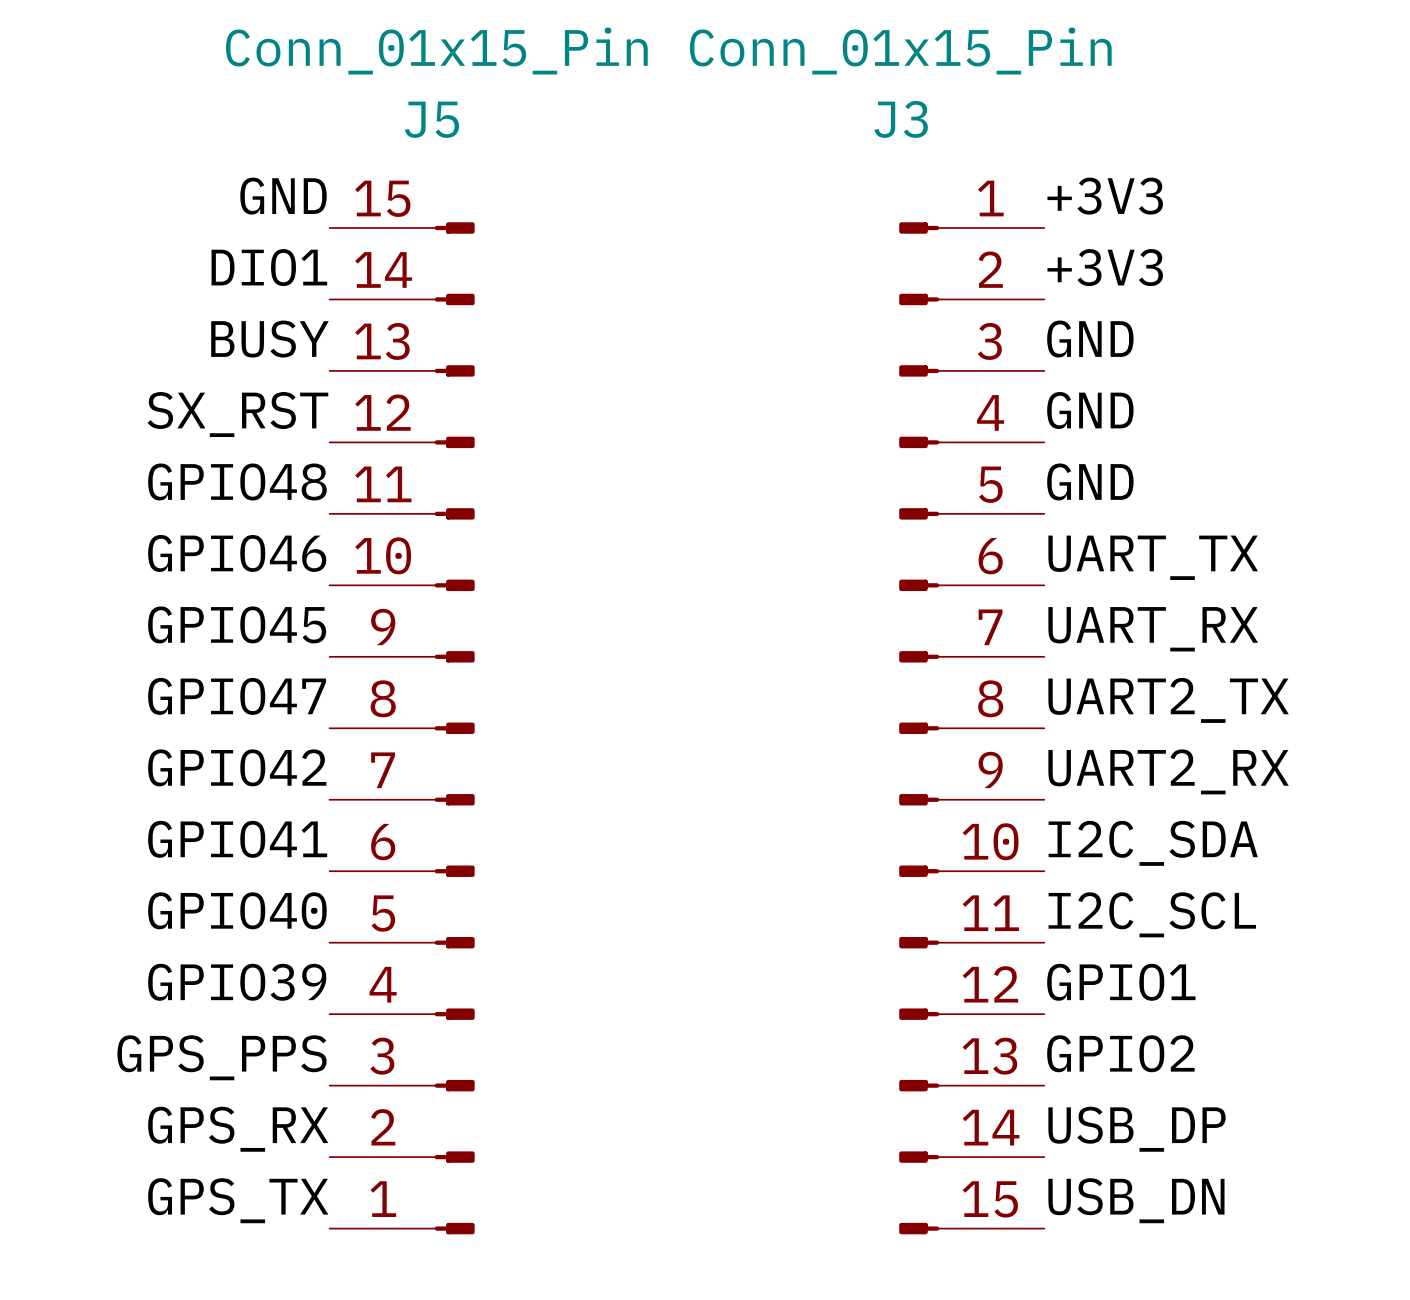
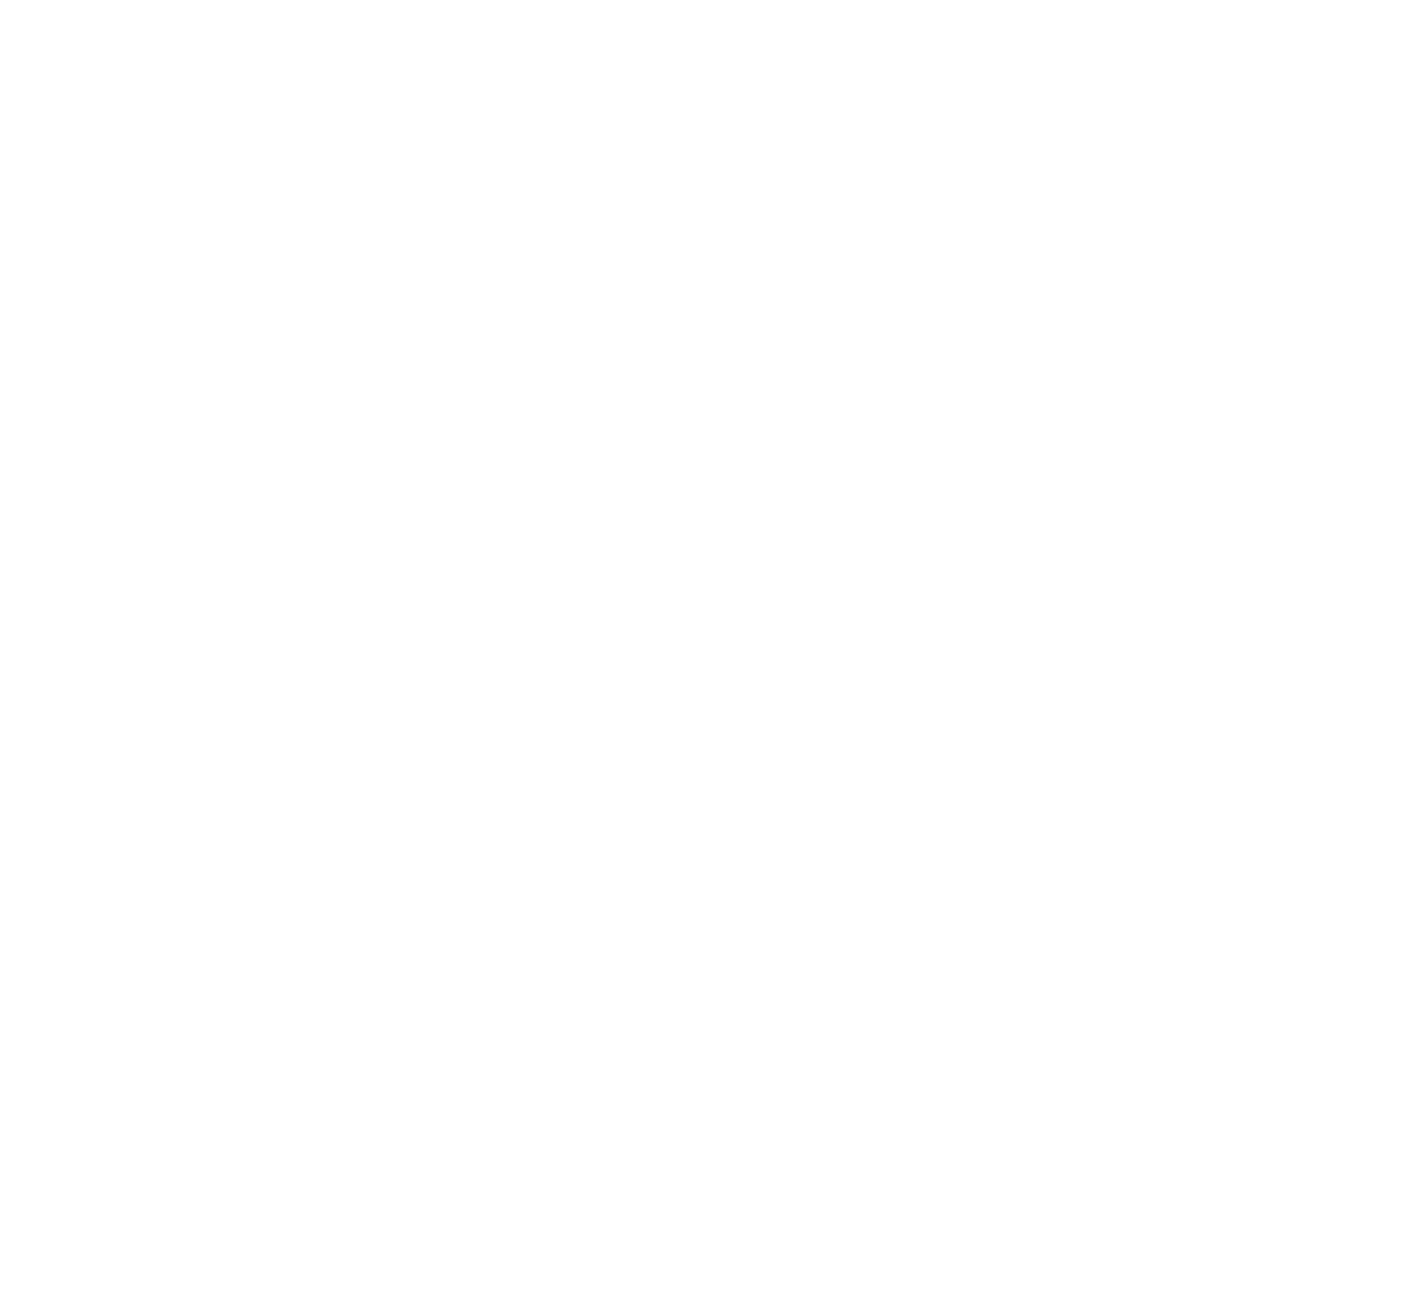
label: GND (283, 196) -> none
label: +3V3 (1105, 196) -> none
label: DIO1 (269, 267) -> none
label: +3V3 (1105, 267) -> none
label: BUSY (269, 339) -> none
label: GND (1090, 339) -> none
label: GND (1090, 410) -> none
label: SX_RST (237, 414) -> none
label: GPIO48 (237, 481) -> none
label: GND (1090, 481) -> none
label: GPIO46 (237, 553) -> none
label: UART_TX (1153, 557) -> none
label: GPIO45 (237, 624) -> none
label: UART_RX (1153, 629) -> none
label: GPIO47 (237, 696) -> none
label: UART2_TX (1168, 700) -> none
J5: Conn_01x15_Pin (402, 728) -> none
J3: Conn_01x15_Pin (971, 728) -> none
label: GPIO42 (237, 767) -> none
label: UART2_RX (1168, 771) -> none
label: GPIO41 (237, 839) -> none
label: I2C_SDA (1153, 843) -> none
label: GPIO40 (237, 910) -> none
label: I2C_SCL (1152, 914) -> none
label: GPIO39 (237, 982) -> none
label: GPIO1 (1121, 982) -> none
label: GPIO2 (1120, 1053) -> none
label: GPS_PPS (222, 1057) -> none
label: GPS_RX (238, 1129) -> none
label: USB_DP (1137, 1129) -> none
label: GPS_TX (238, 1200) -> none
label: USB_DN (1136, 1200) -> none

